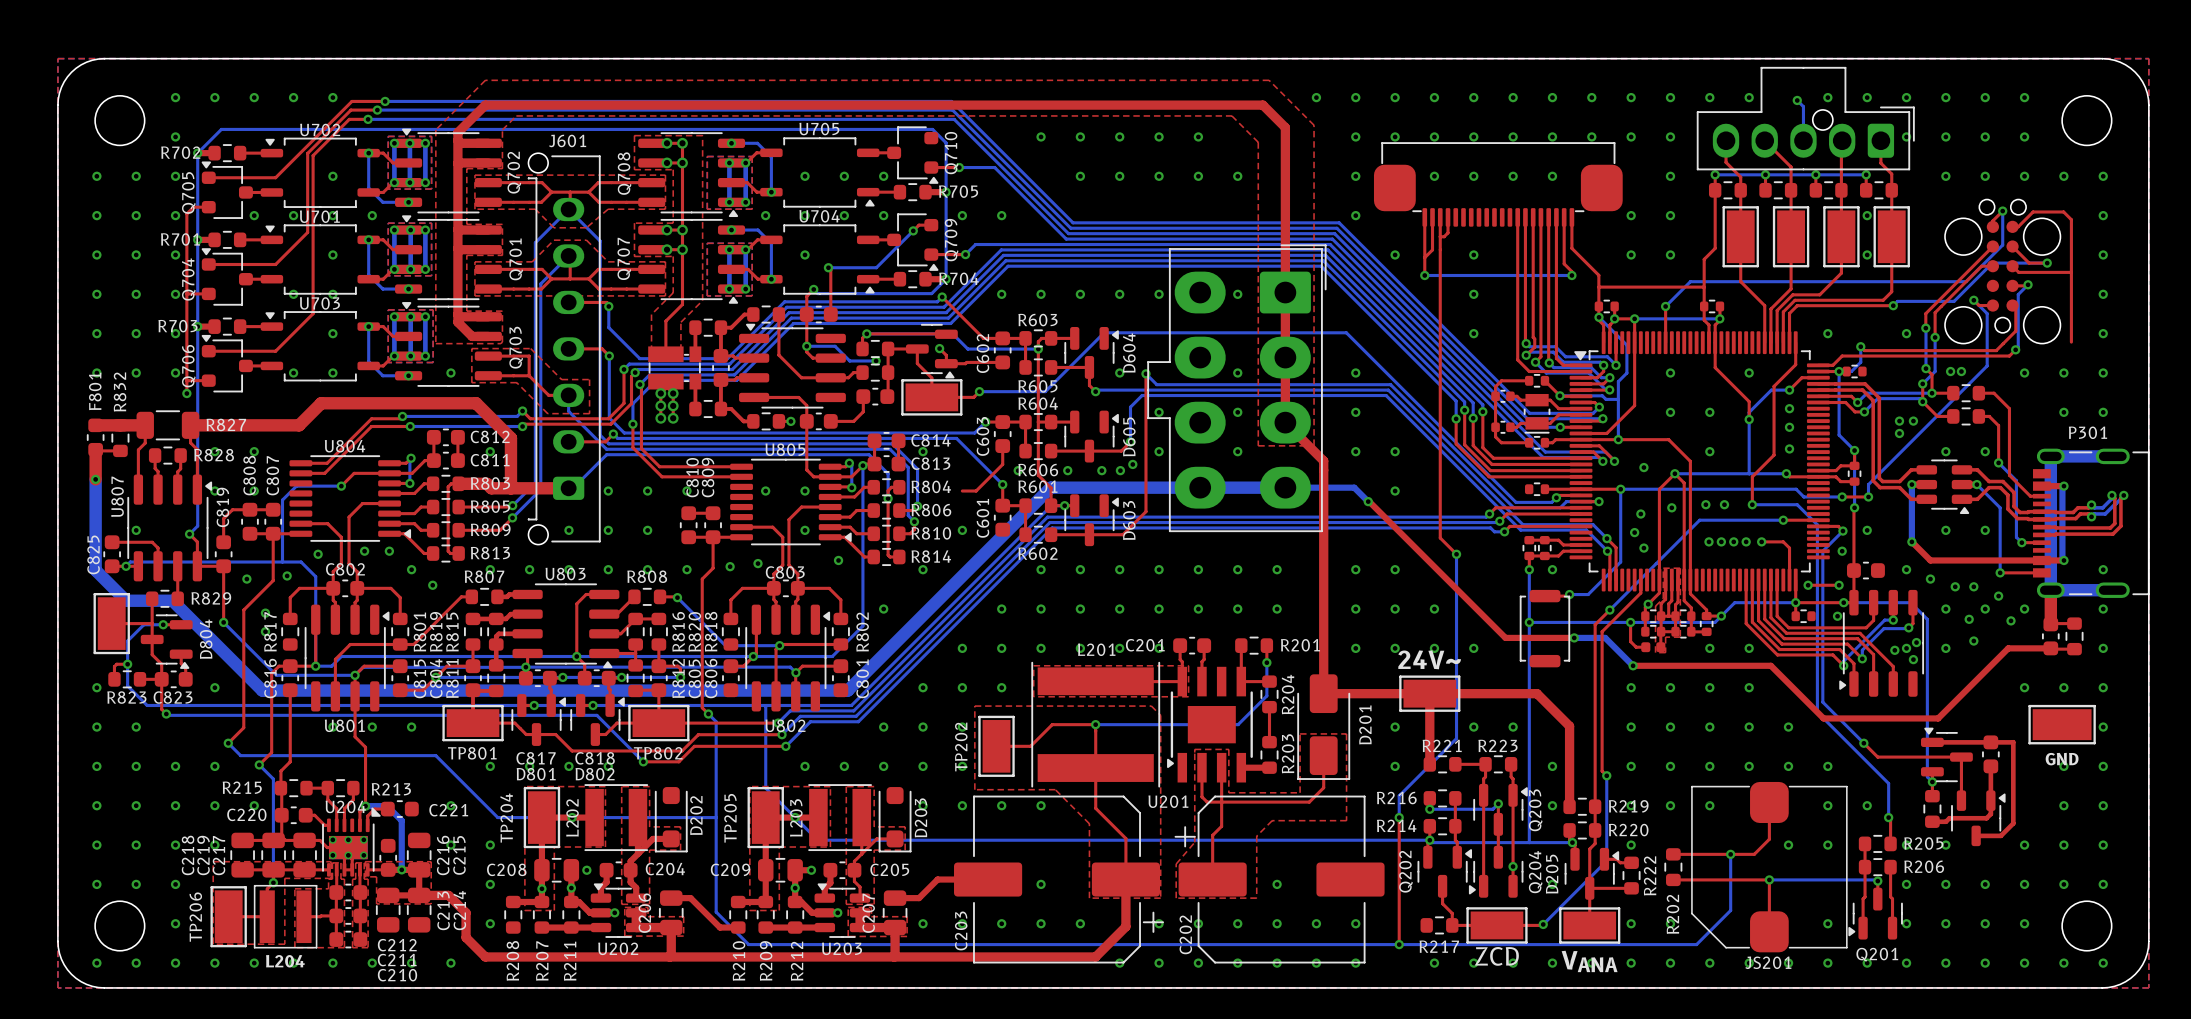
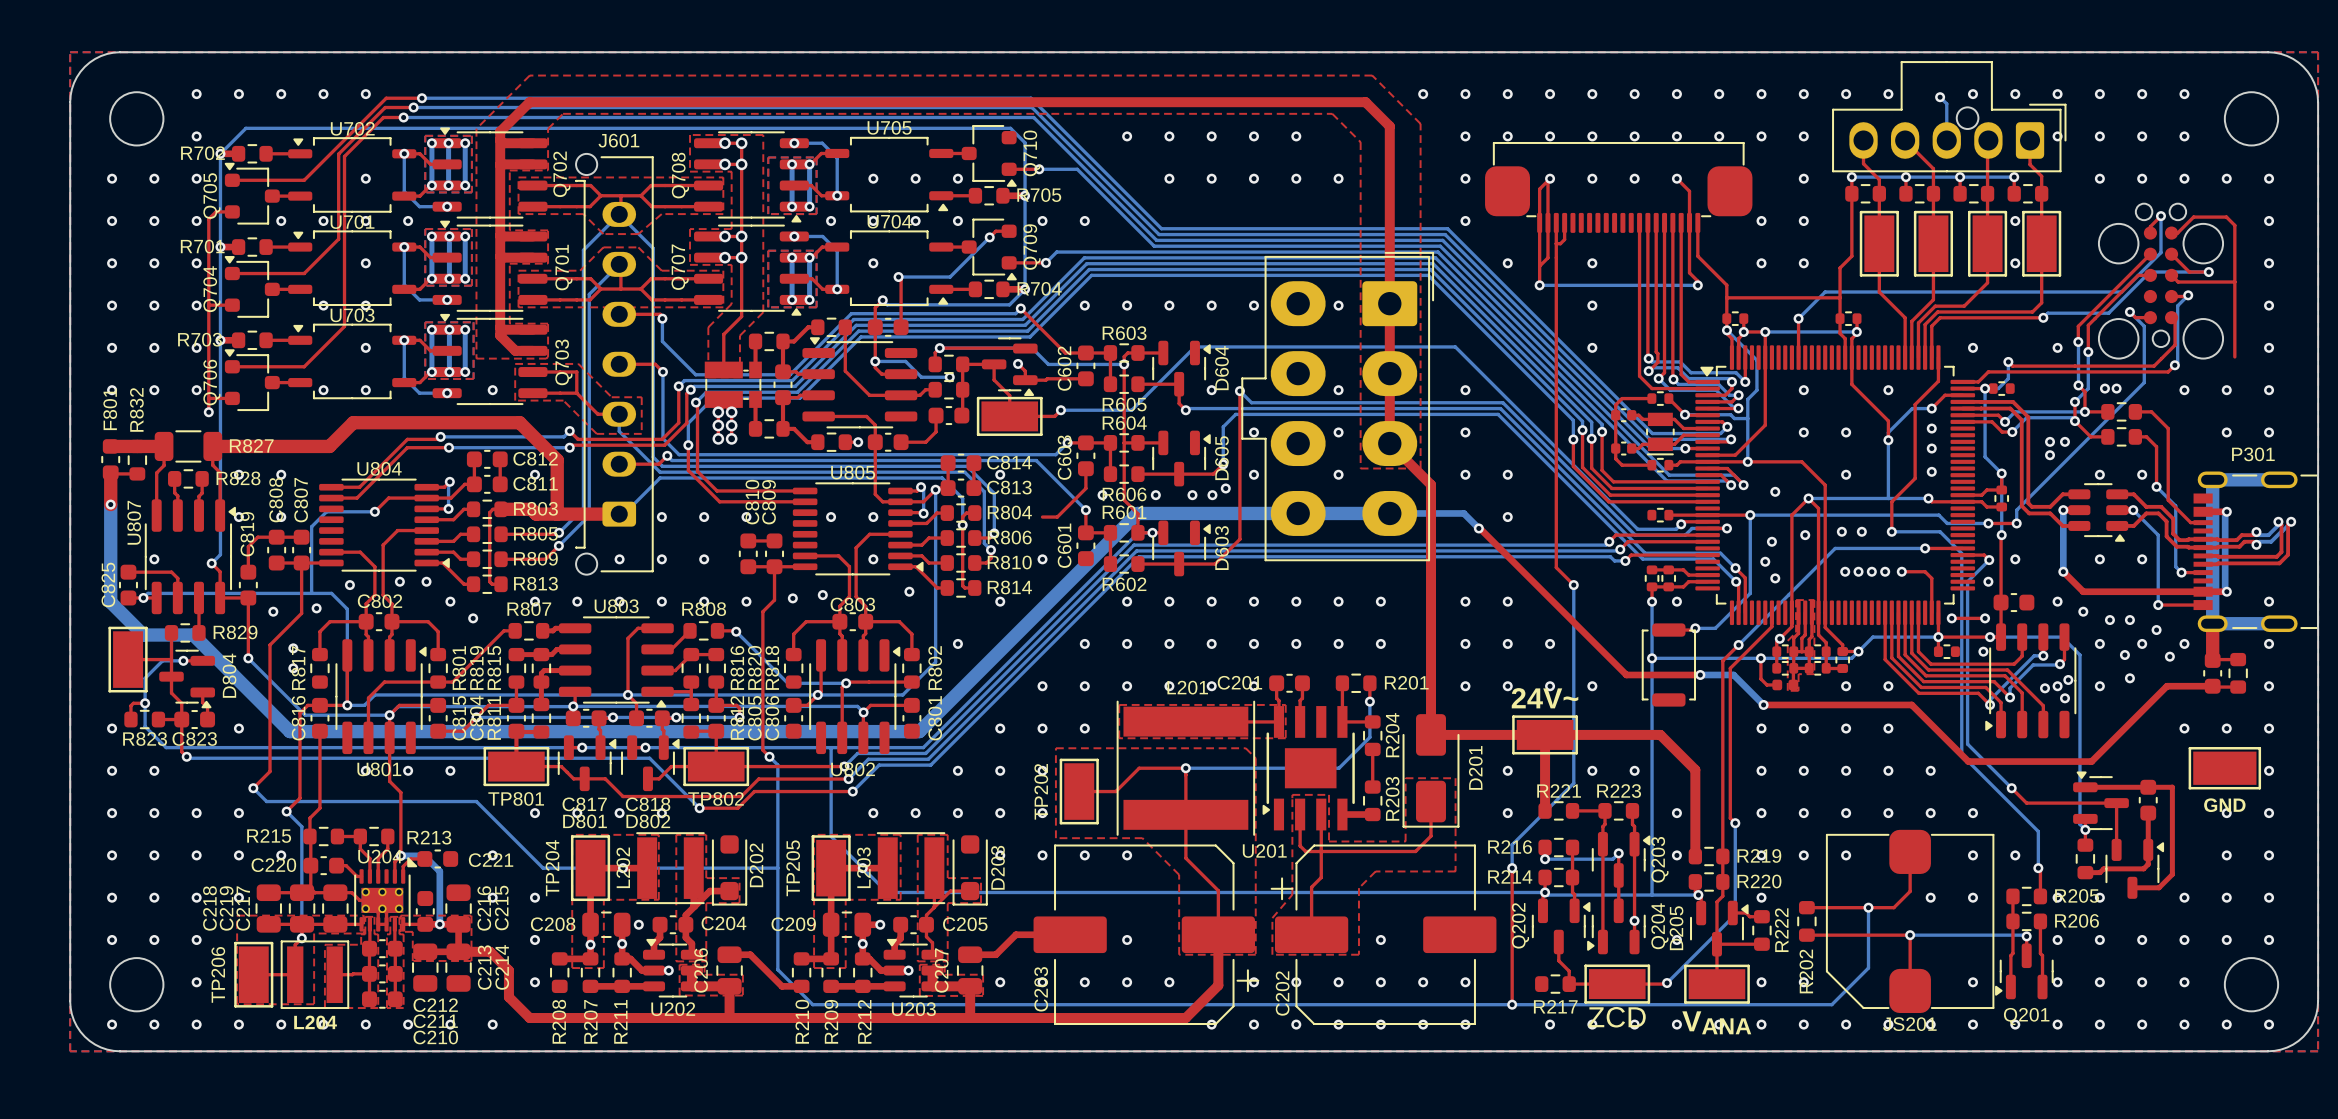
top track: none -> (1550, 178) (1539, 189) (1539, 222)
top track: none -> (1676, 178) (1689, 191) (1689, 222)
top track: none -> (1547, 180) (1547, 222)

